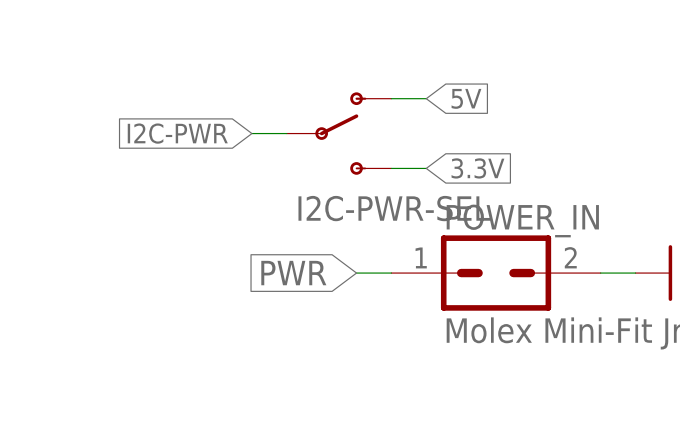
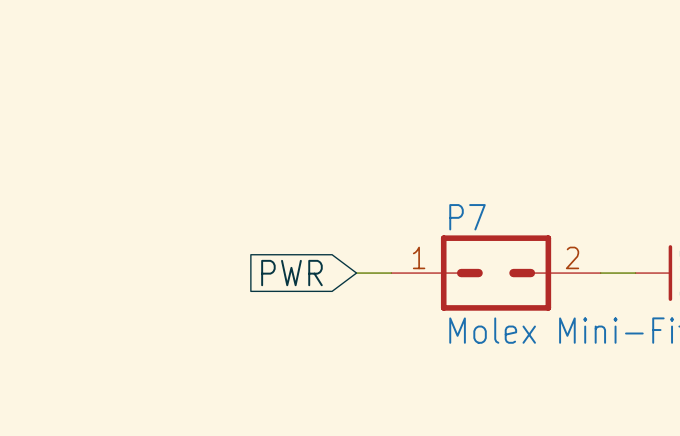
wire: (391, 98) (426, 98) -> none
global label: 5V (466, 98) -> none
global label: I2C-PWR (177, 133) -> none
wire: (251, 133) (286, 133) -> none
I2C-PWR-SEL: (339, 133) -> none
wire: (391, 168) (426, 168) -> none
global label: 3.3V (477, 168) -> none
POWER_IN name: POWER_IN (522, 220) -> P7 (467, 217)

